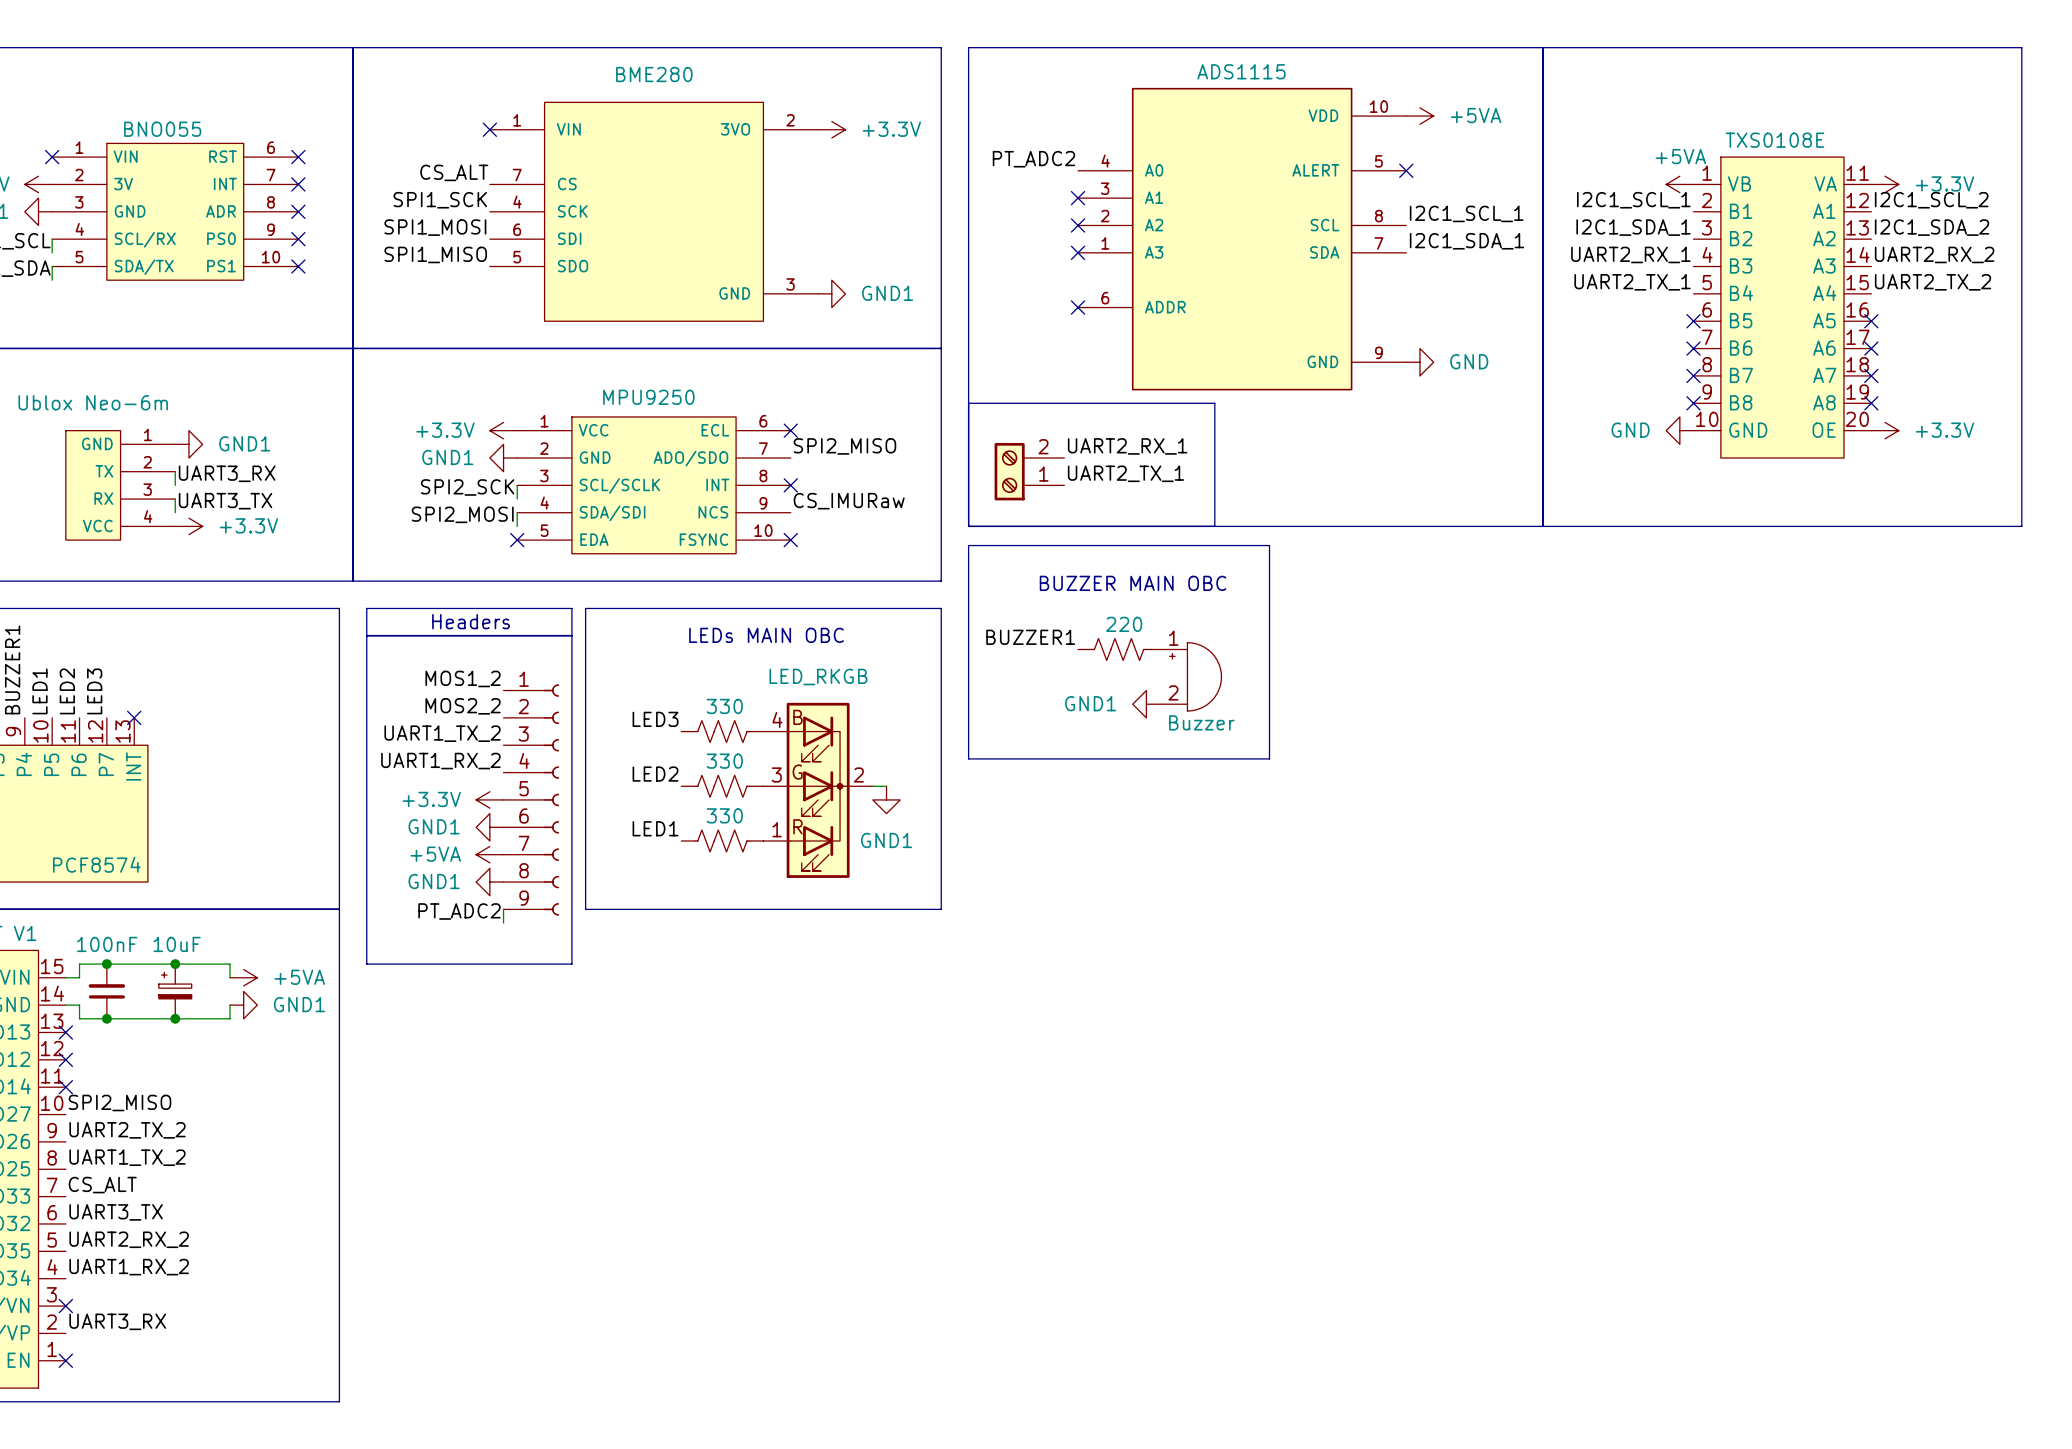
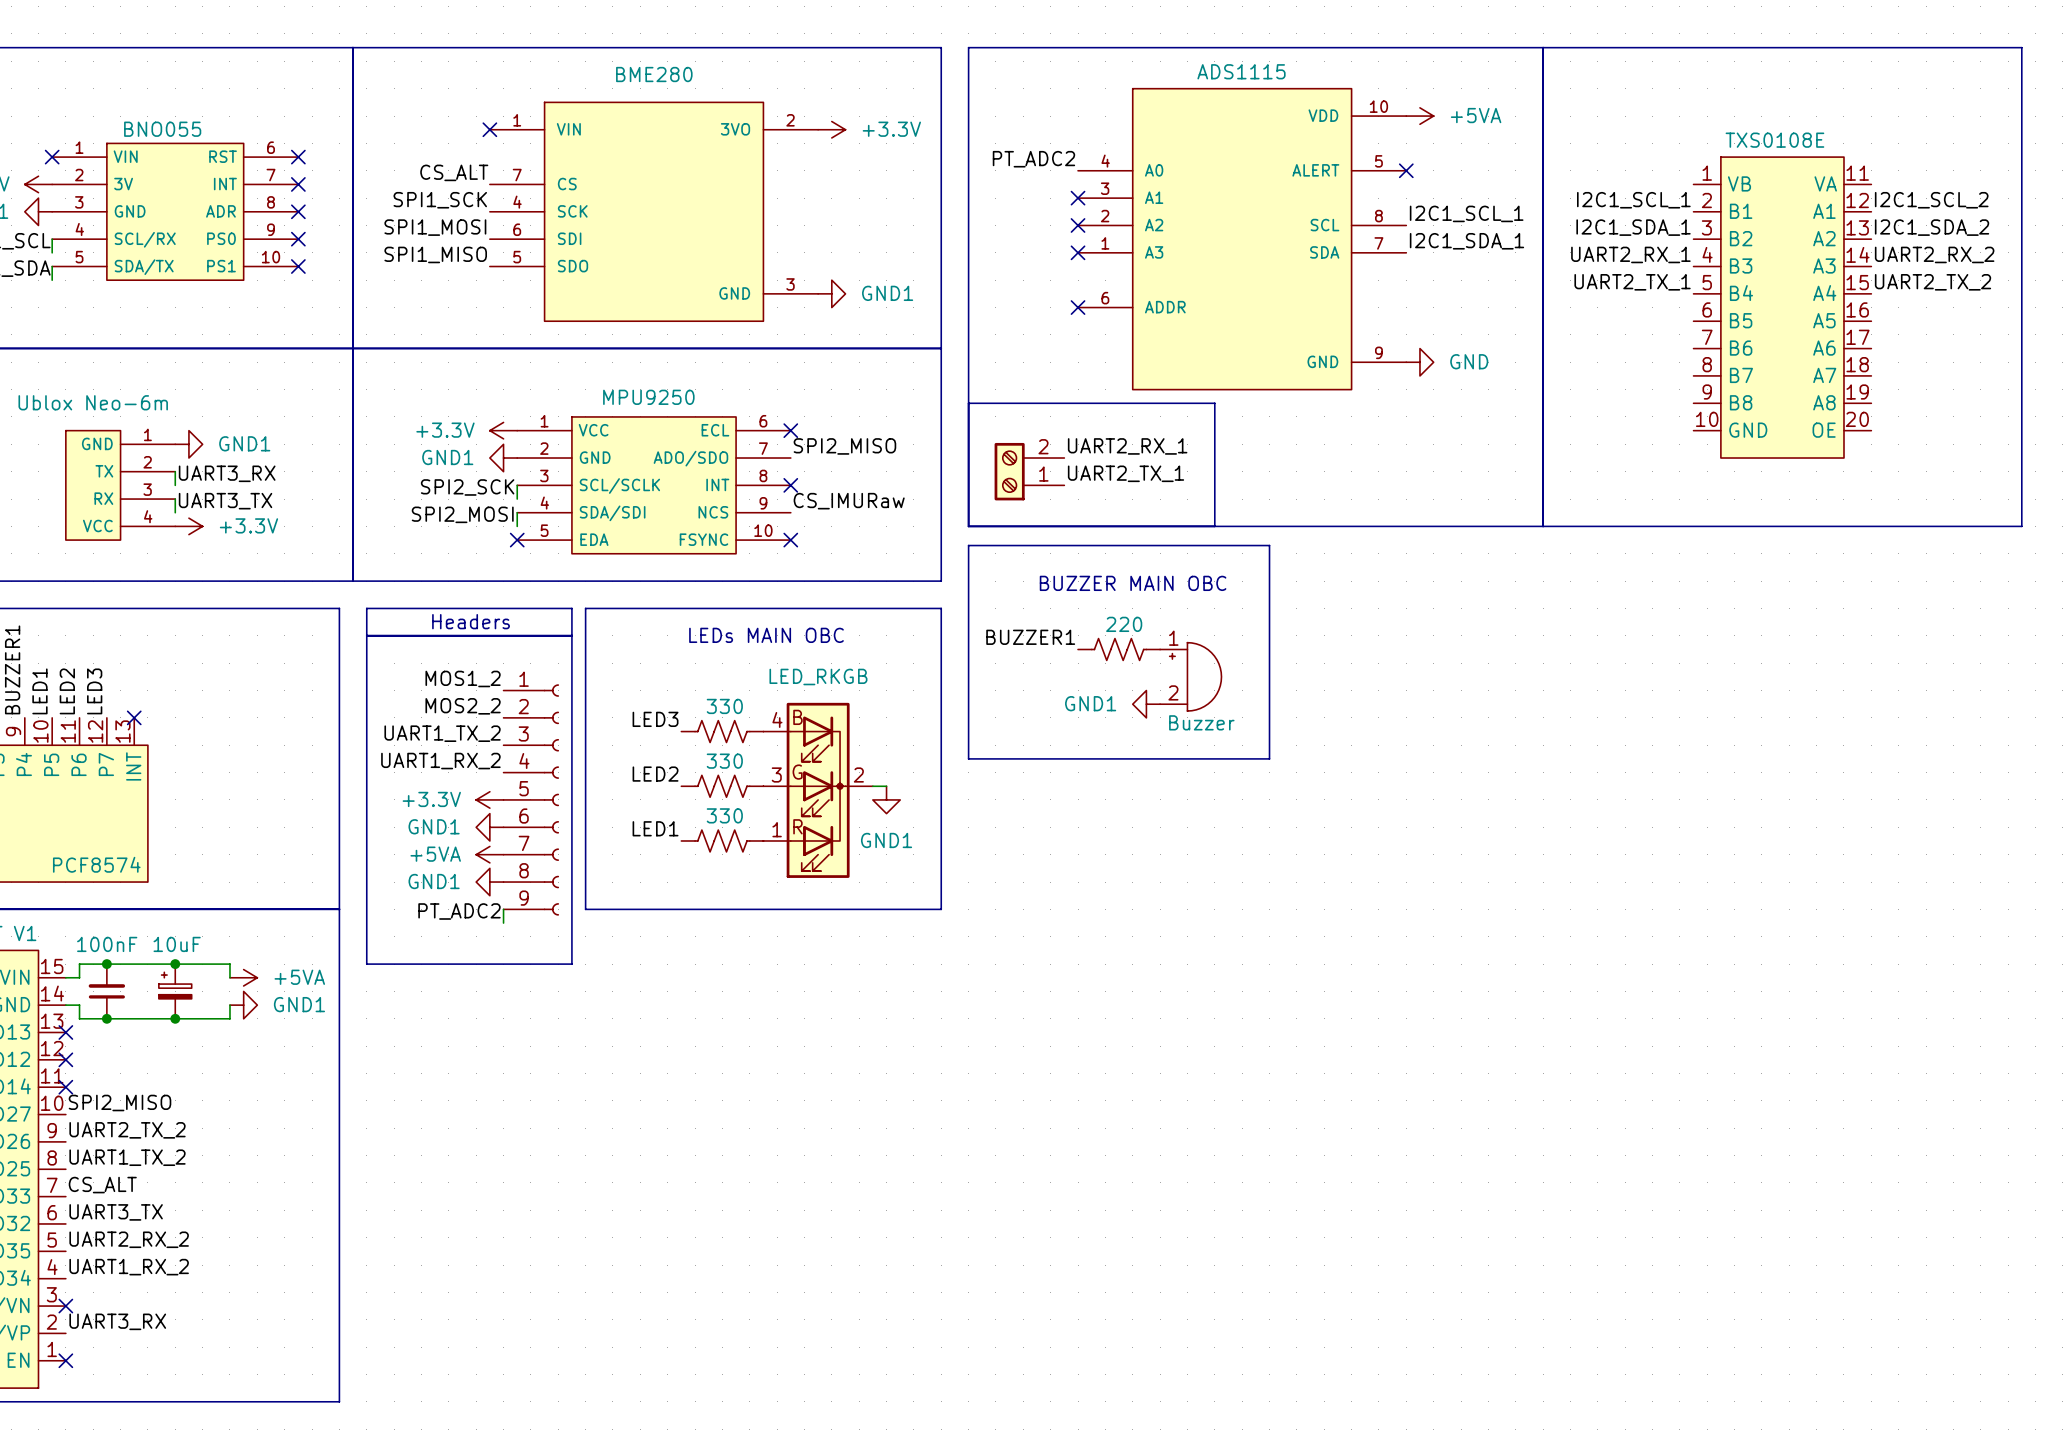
power symbol: +5VA (1679, 184) -> none
power symbol: +3.3V (1885, 184) -> none
no-connect mark: (1693, 321) -> none
no-connect mark: (1871, 321) -> none
no-connect mark: (1693, 348) -> none
no-connect mark: (1871, 348) -> none
no-connect mark: (1693, 375) -> none
no-connect mark: (1871, 375) -> none
no-connect mark: (1693, 403) -> none
no-connect mark: (1871, 403) -> none
power symbol: GND (1679, 430) -> none
power symbol: +3.3V (1885, 430) -> none

